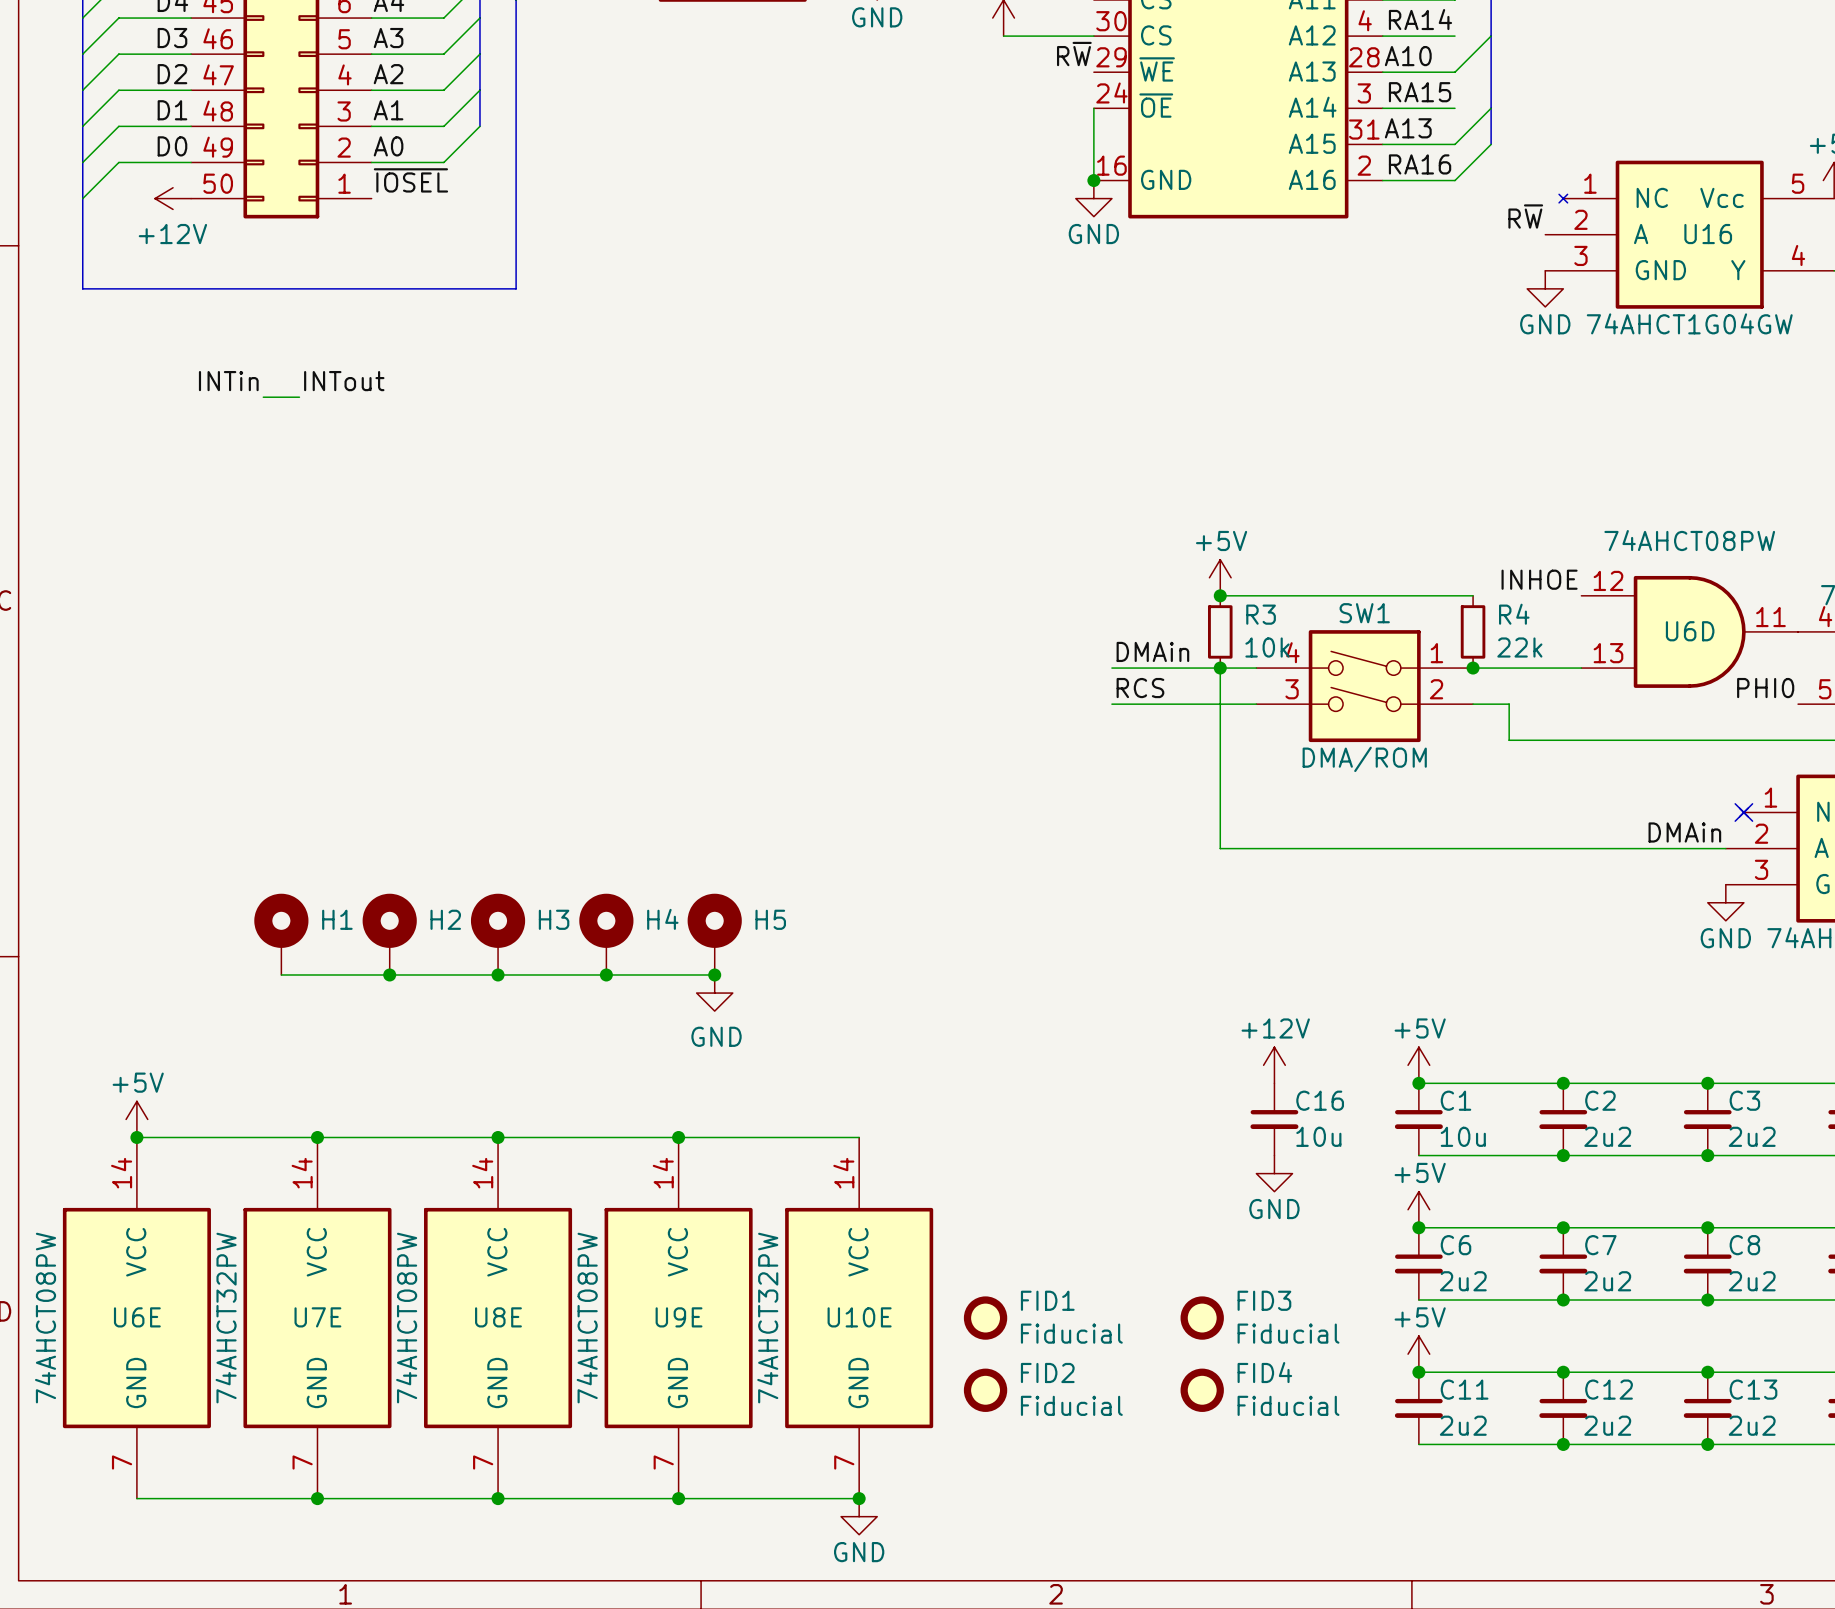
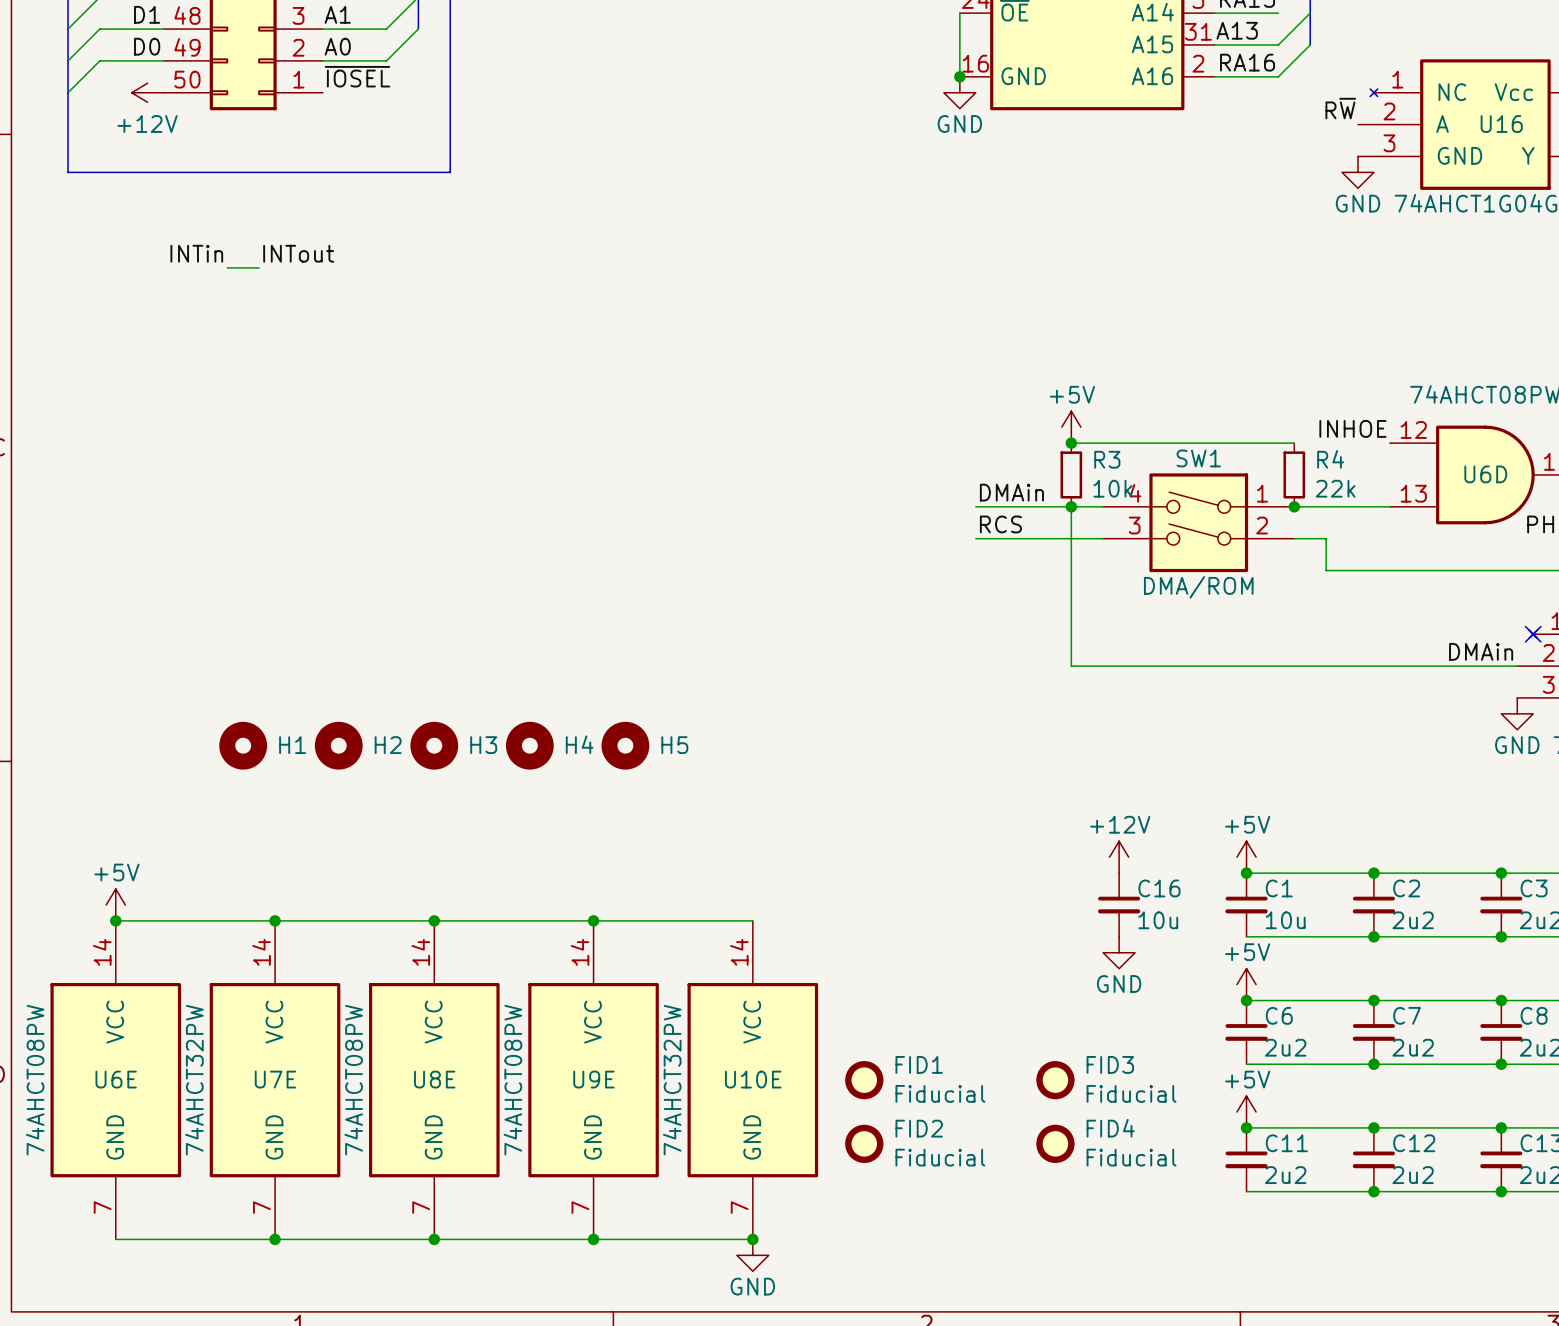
H1 symbol: [254, 893, 309, 975] -> [219, 721, 268, 770]
H2 symbol: [362, 893, 417, 975] -> [314, 721, 363, 770]
H3 symbol: [470, 893, 526, 975] -> [410, 721, 459, 770]
H4 symbol: [579, 893, 634, 975] -> [505, 721, 554, 770]
H5 symbol: [687, 893, 742, 975] -> [601, 721, 650, 770]
wire: (281, 974) (714, 974) -> none
junction: (389, 974) -> none
junction: (498, 974) -> none
junction: (606, 974) -> none
junction: (714, 974) -> none
power symbol: GND (714, 993) -> none

